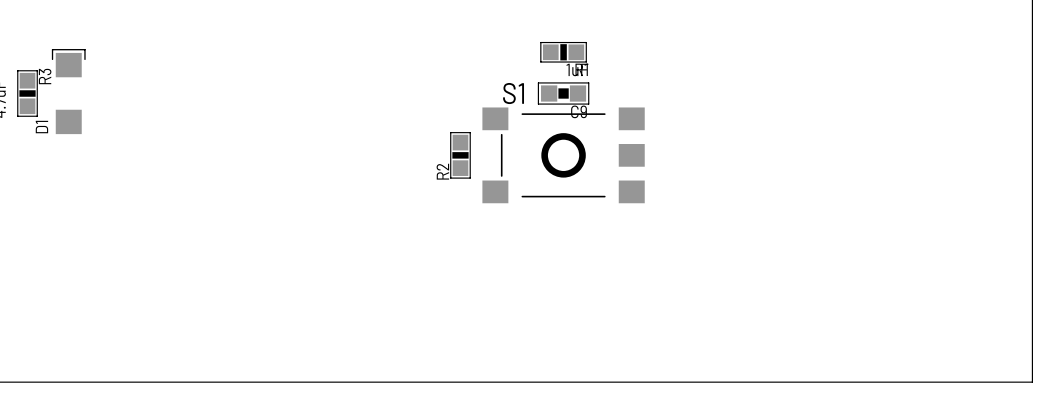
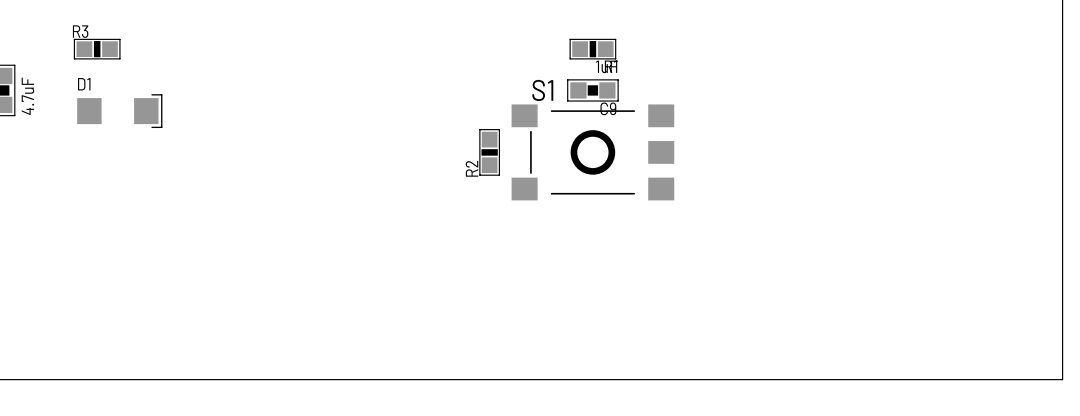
D1 rotation: 0° (68, 91) -> 90° clockwise (119, 111)
R3 rotation: 0° (27, 93) -> 90° clockwise (97, 49)
R3 position: (27, 93) -> (97, 49)

